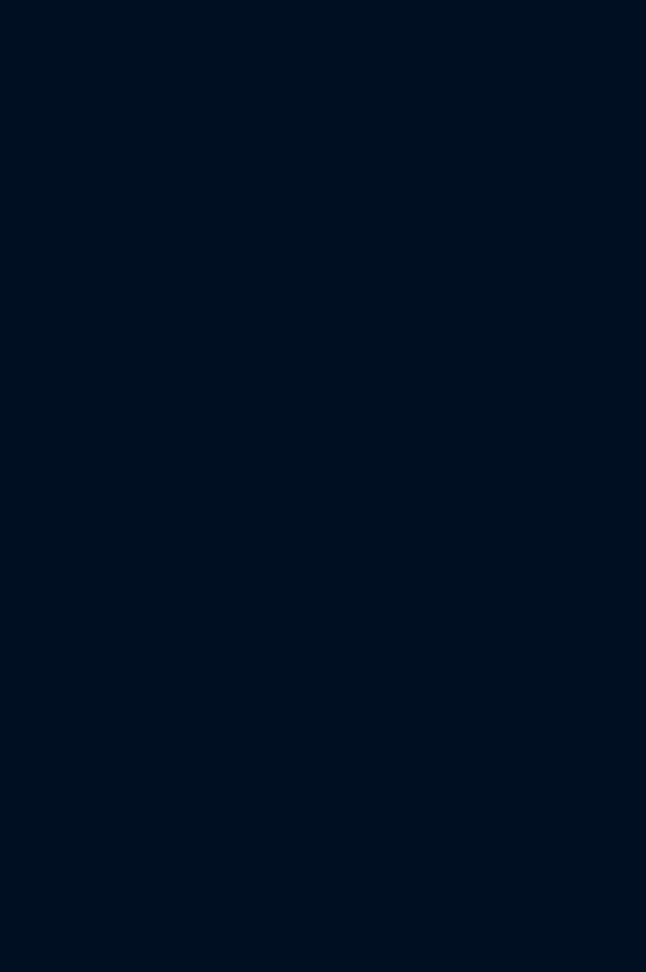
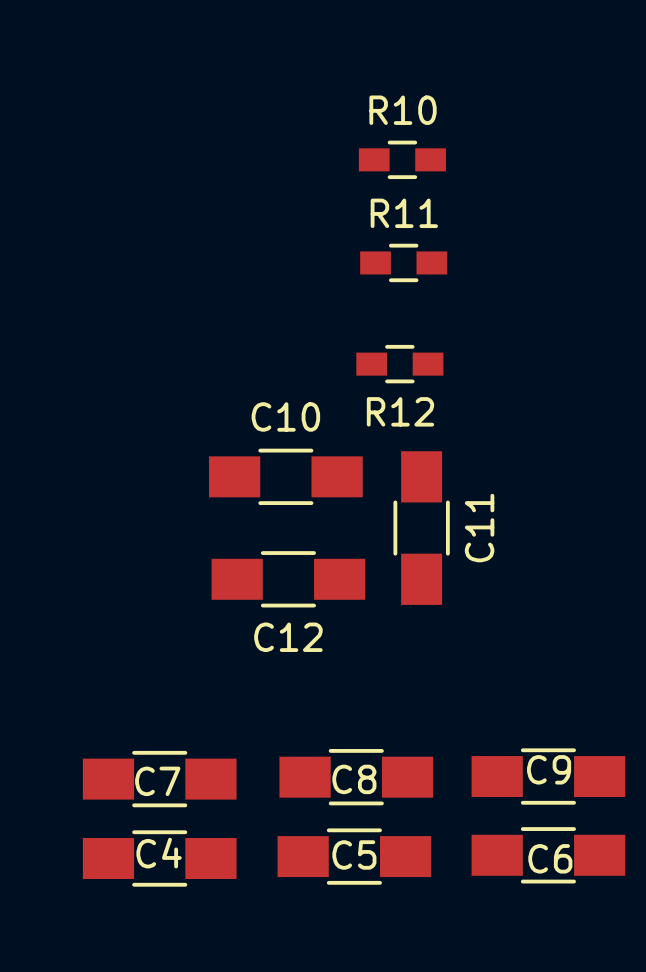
R10: none -> (402, 159)
R11: none -> (403, 262)
R12: none -> (399, 364)
C10: none -> (285, 476)
C11: none -> (421, 528)
C12: none -> (288, 579)
C9: none -> (548, 776)
C8: none -> (356, 777)
C7: none -> (159, 779)
C6: none -> (548, 855)
C5: none -> (354, 856)
C4: none -> (159, 858)

